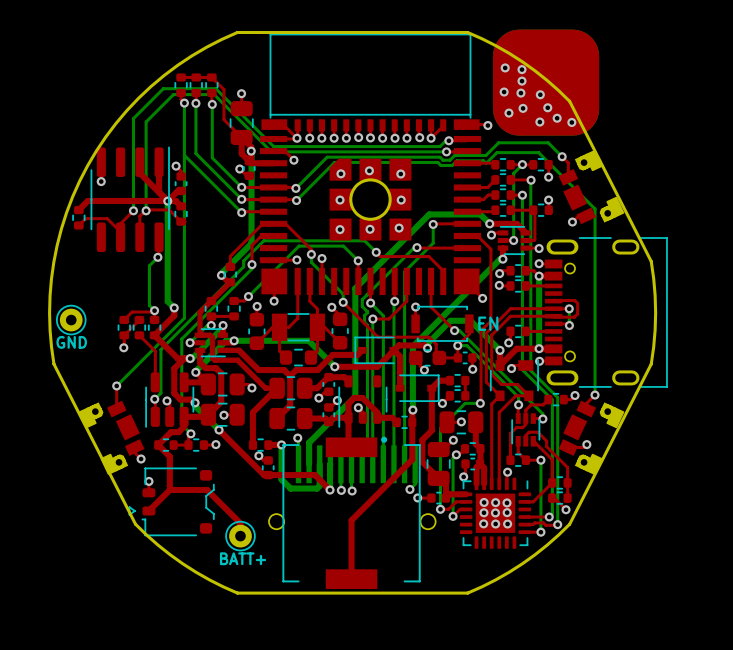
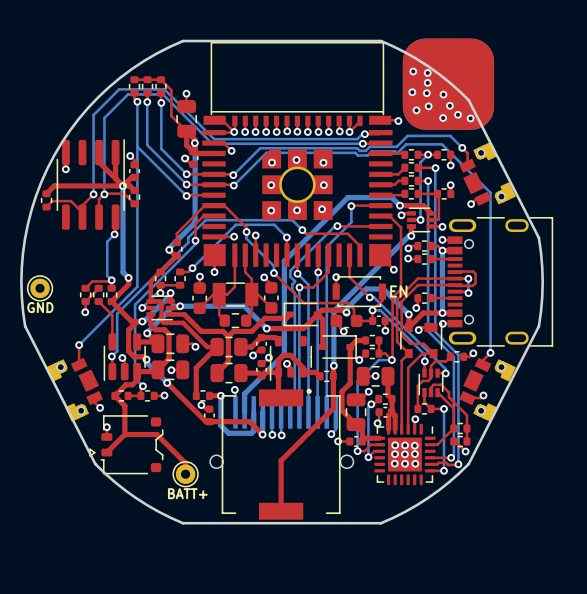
top track: none -> (378, 353) (385, 353) (391, 360)

